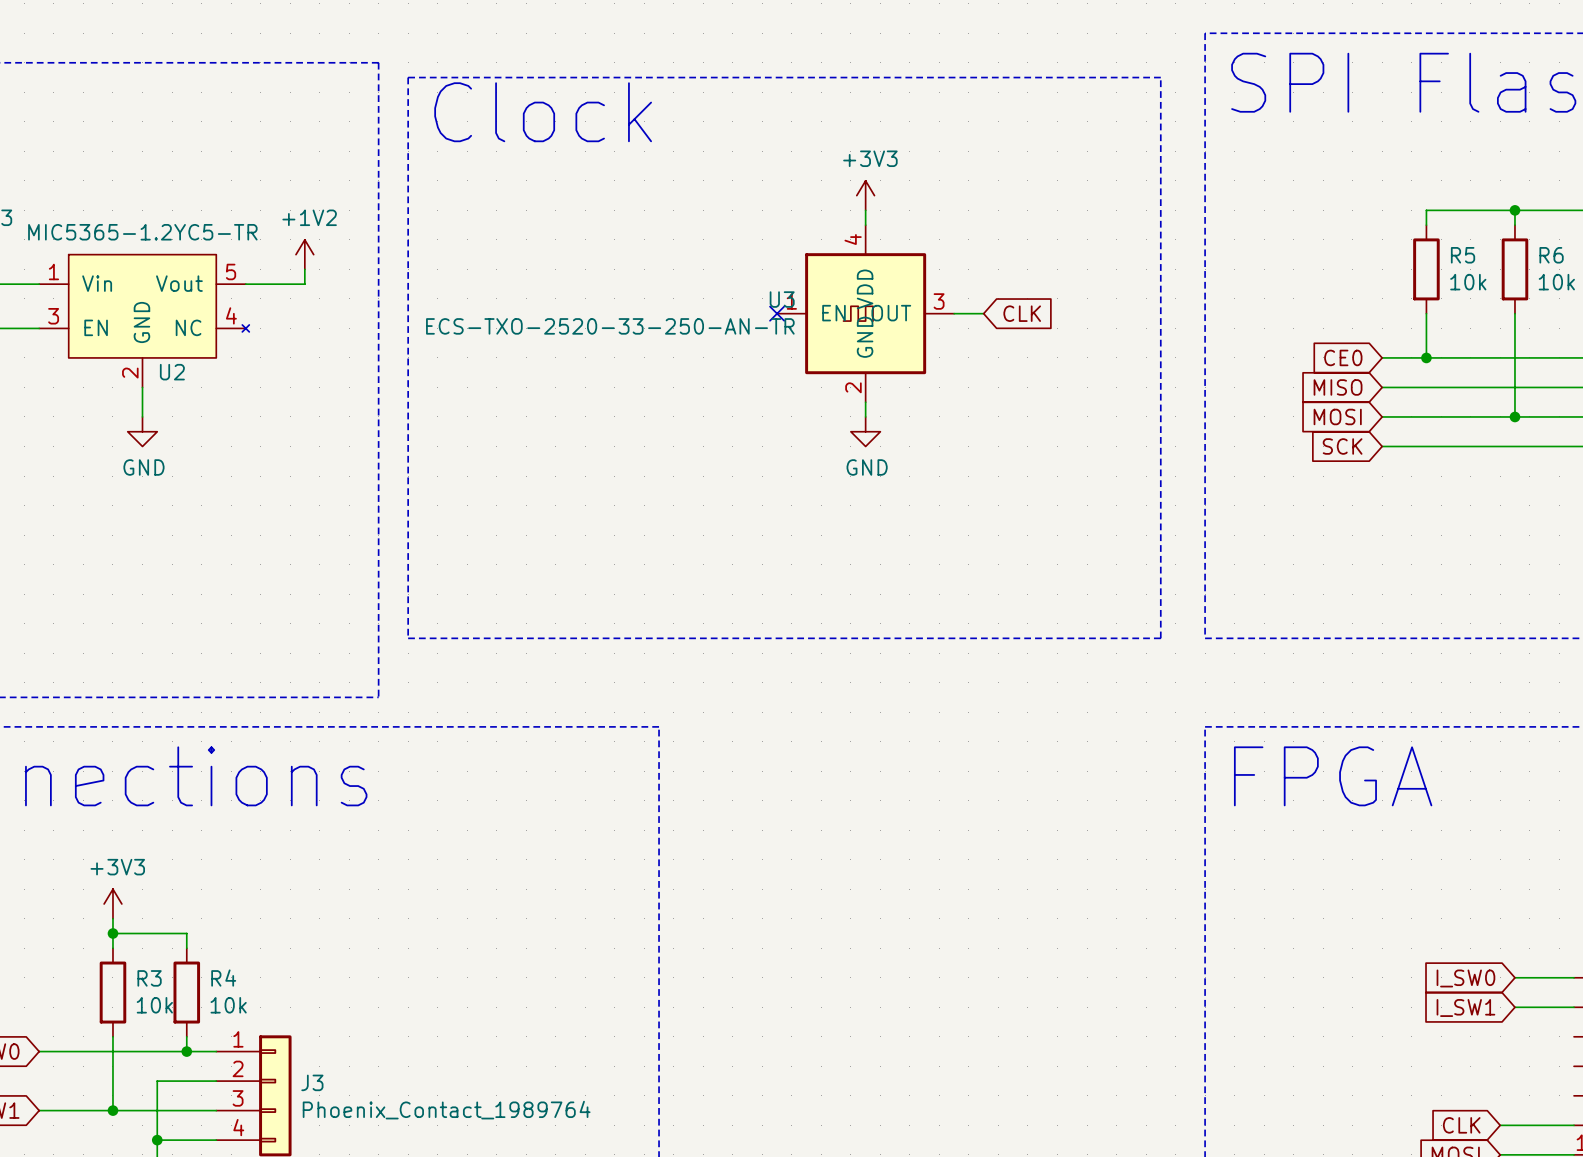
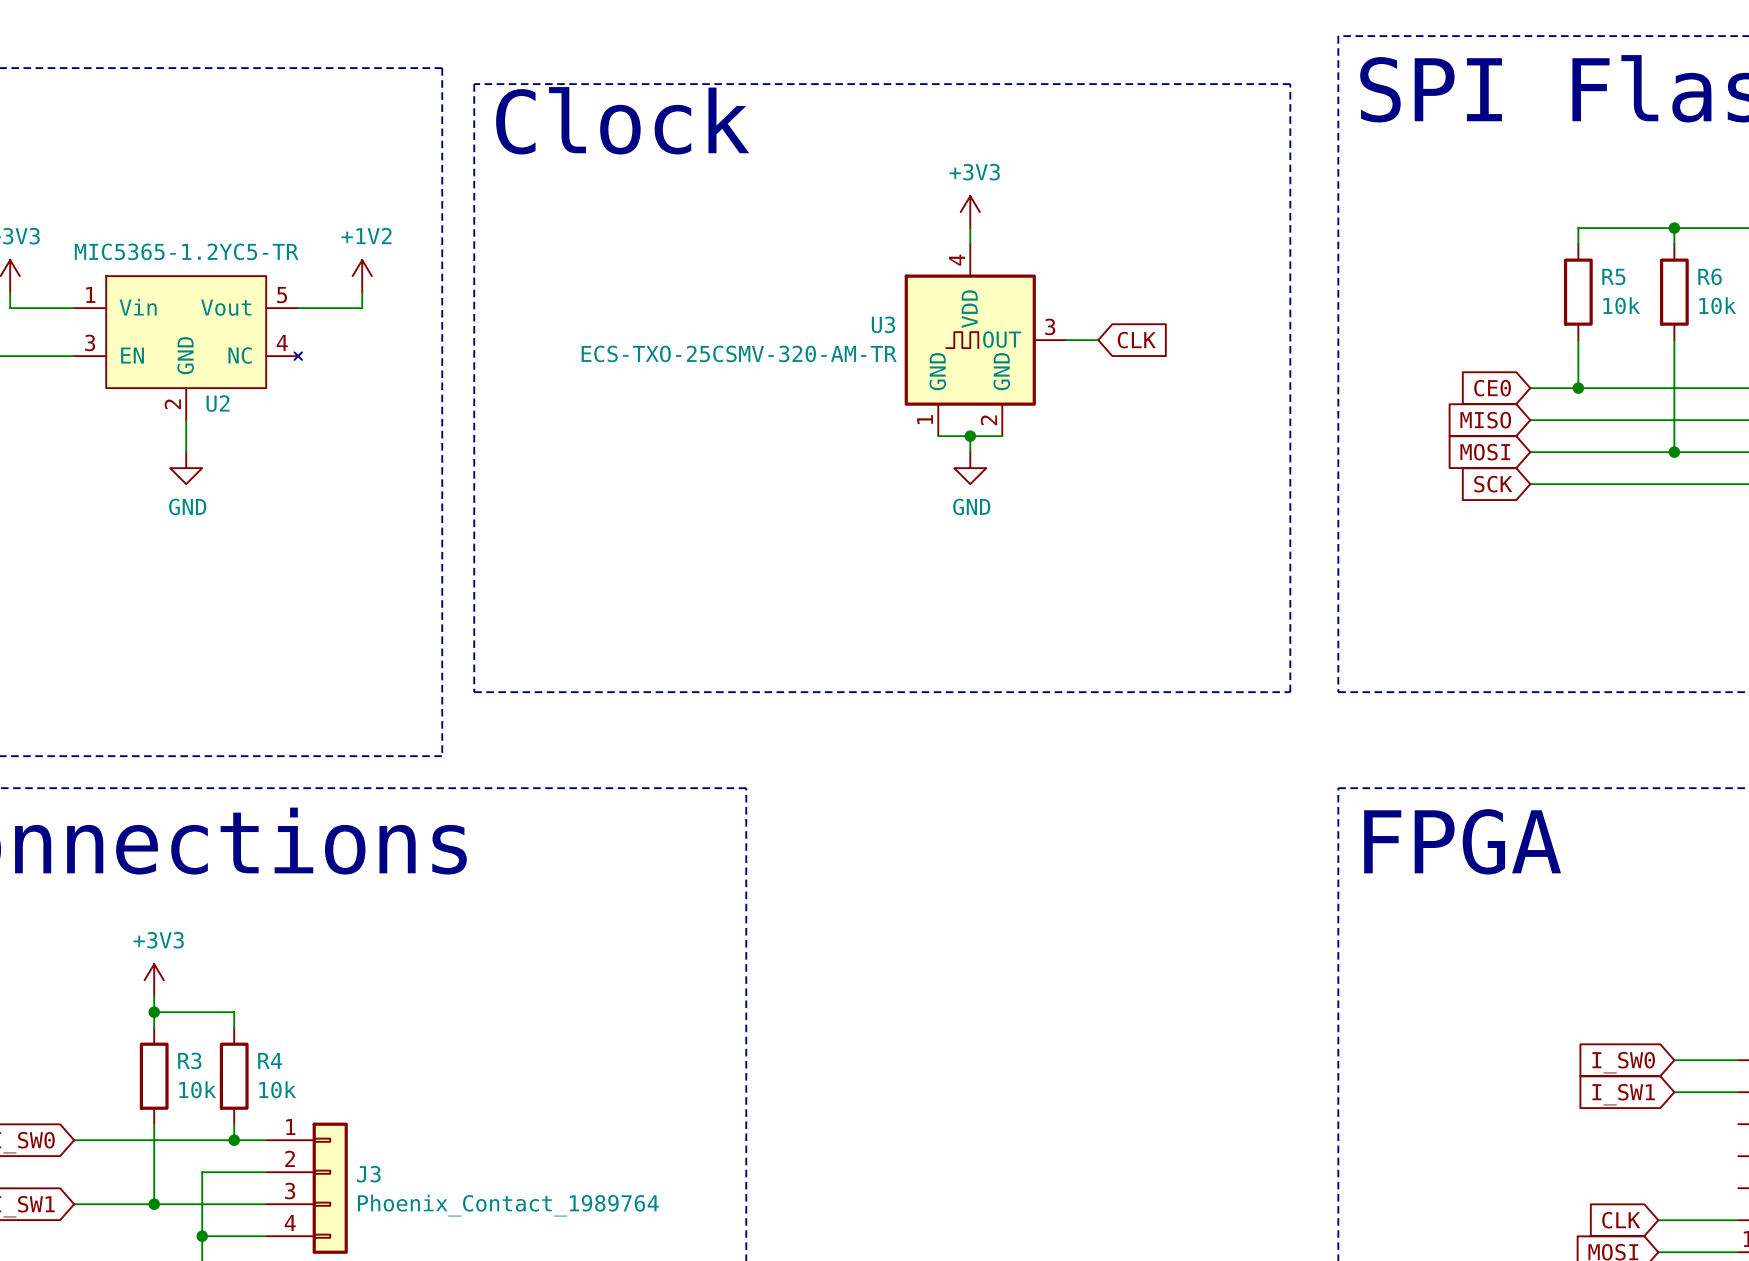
U3 symbol: [777, 225, 955, 403] -> [904, 244, 1067, 437]
no-connect mark: (777, 313) -> none
U3 value: ECS-TXO-2520-33-250-AN-TR (610, 326) -> ECS-TXO-25CSMV-320-AM-TR (739, 353)
wire: none -> (938, 436) (1002, 436)
junction: none -> (970, 436)

